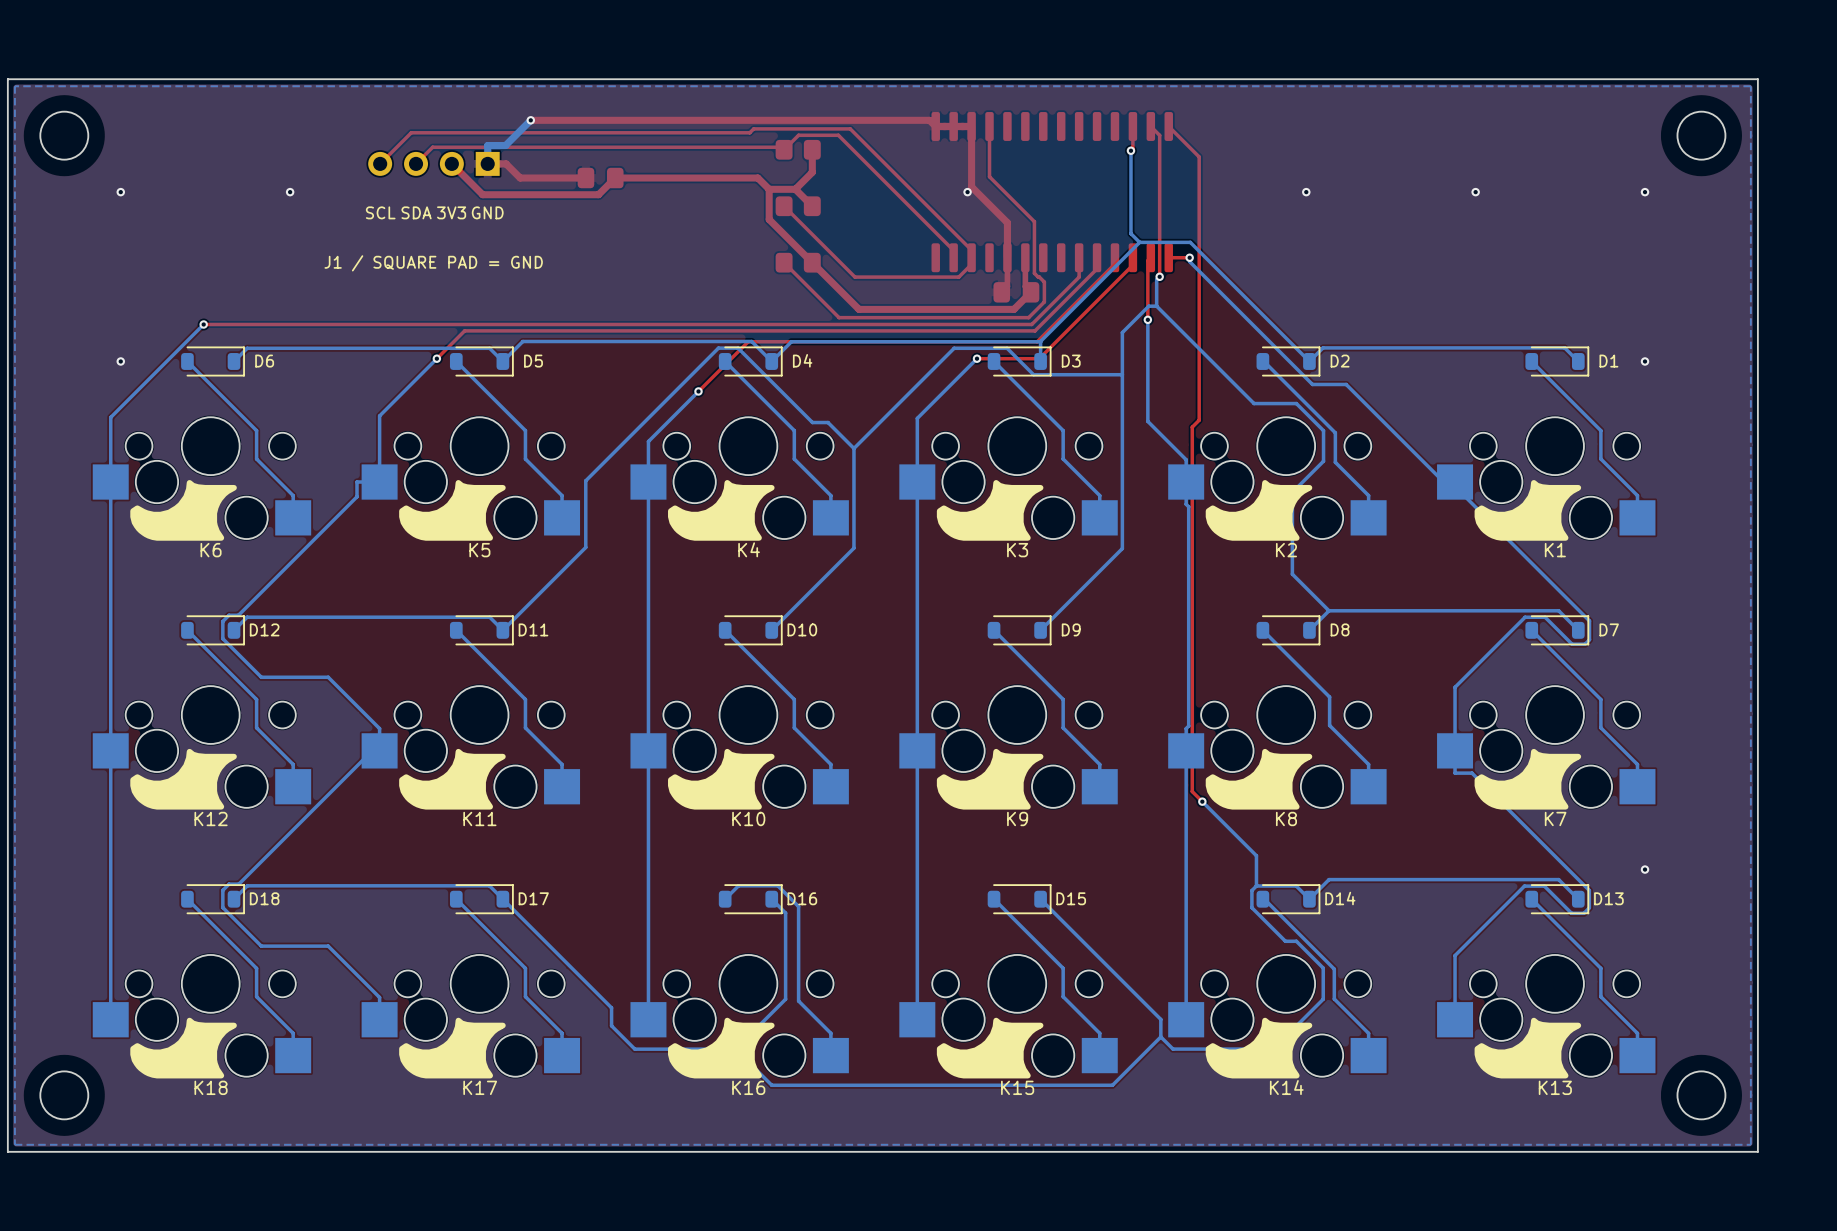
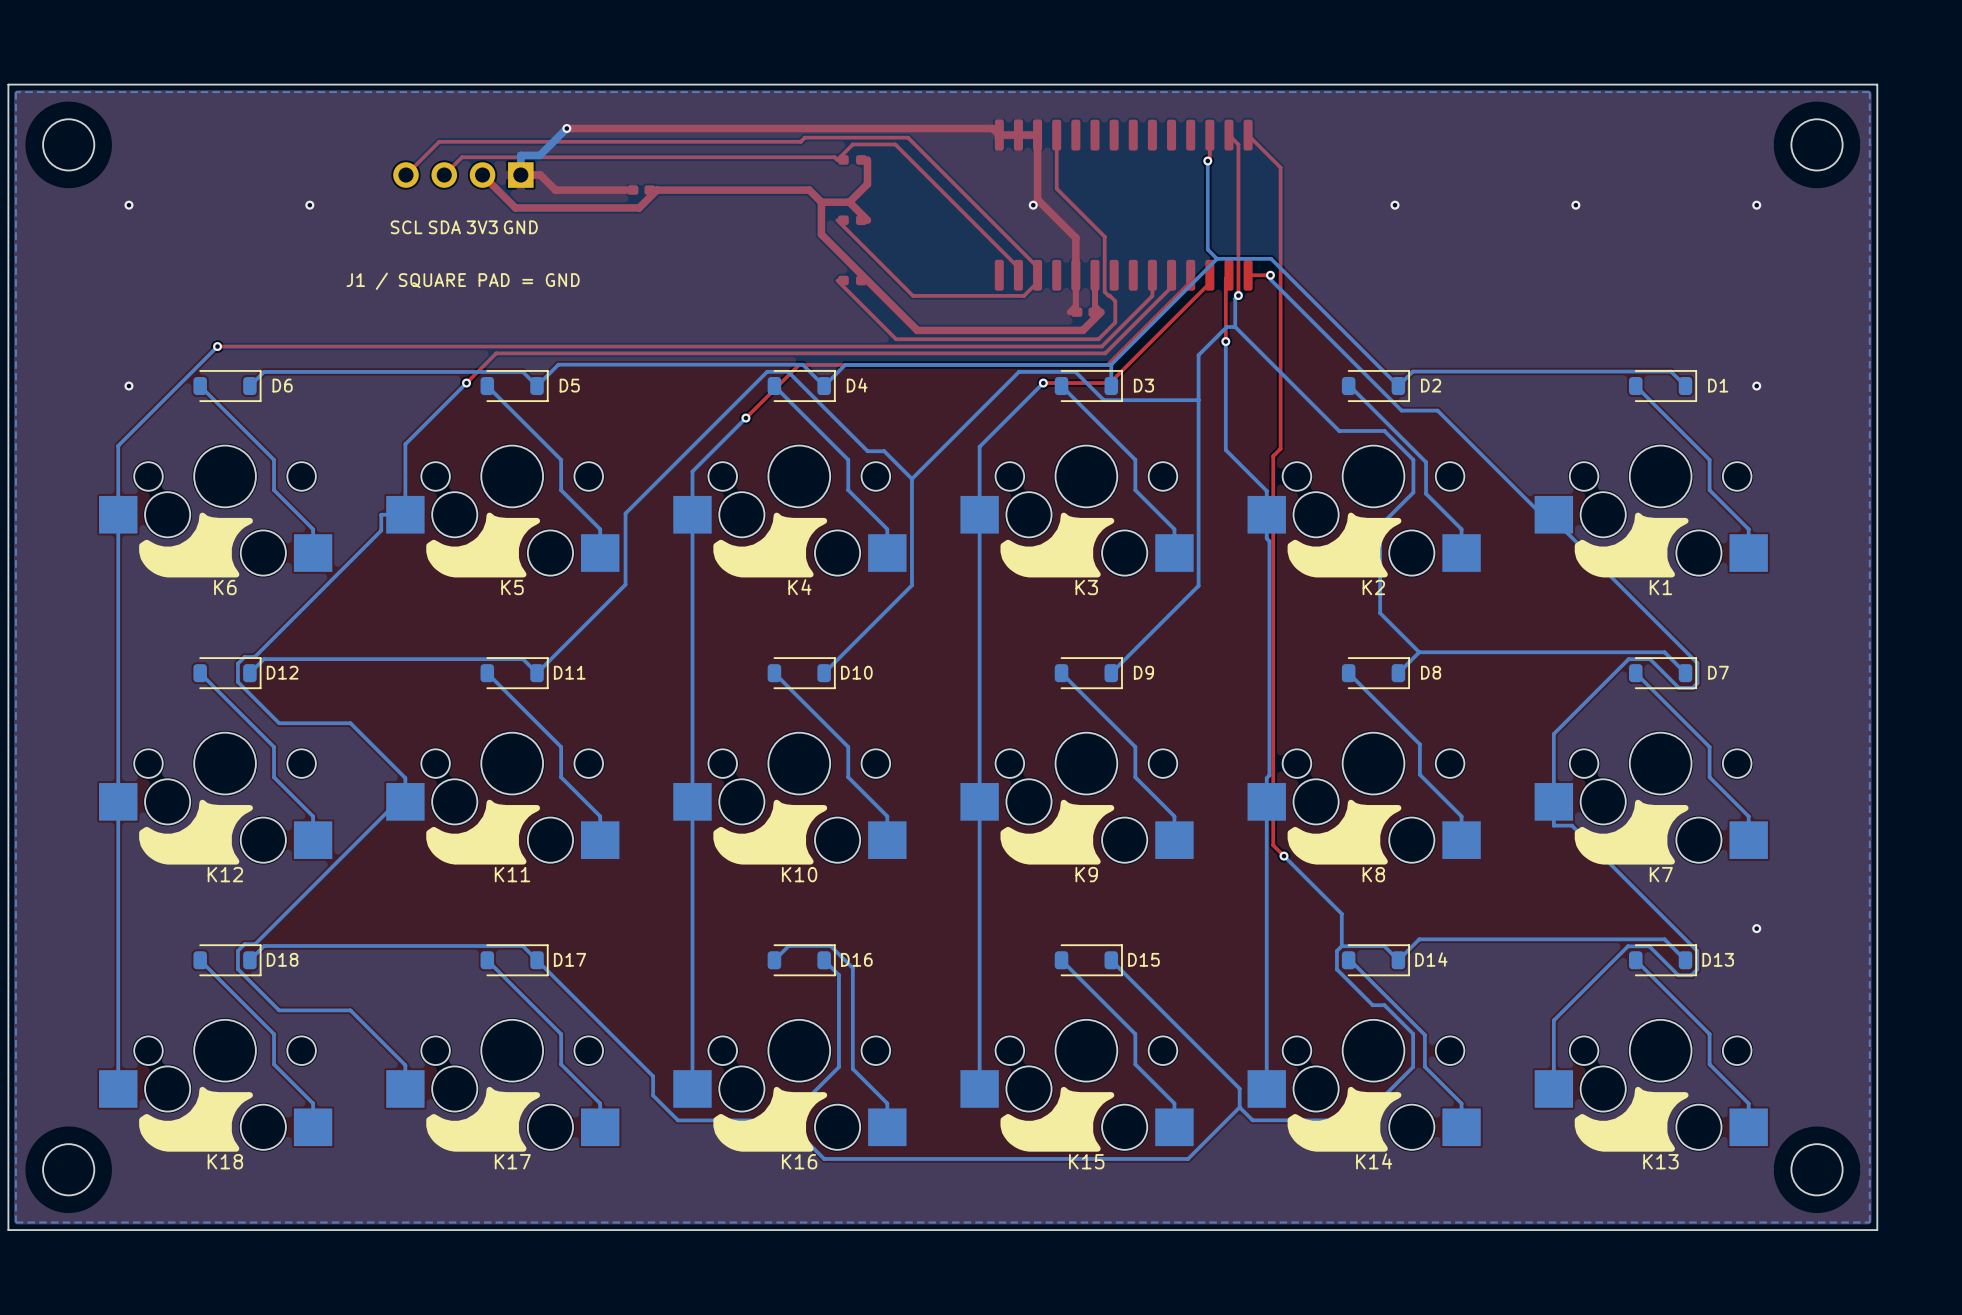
part footprint: [775, 139, 821, 160] -> [838, 155, 867, 165]
part footprint: [577, 167, 624, 189] -> [627, 185, 656, 195]
part footprint: [775, 196, 821, 217] -> [838, 215, 867, 226]
part footprint: [775, 252, 821, 273] -> [838, 275, 867, 286]
part footprint: [993, 282, 1040, 303] -> [1071, 307, 1100, 317]

